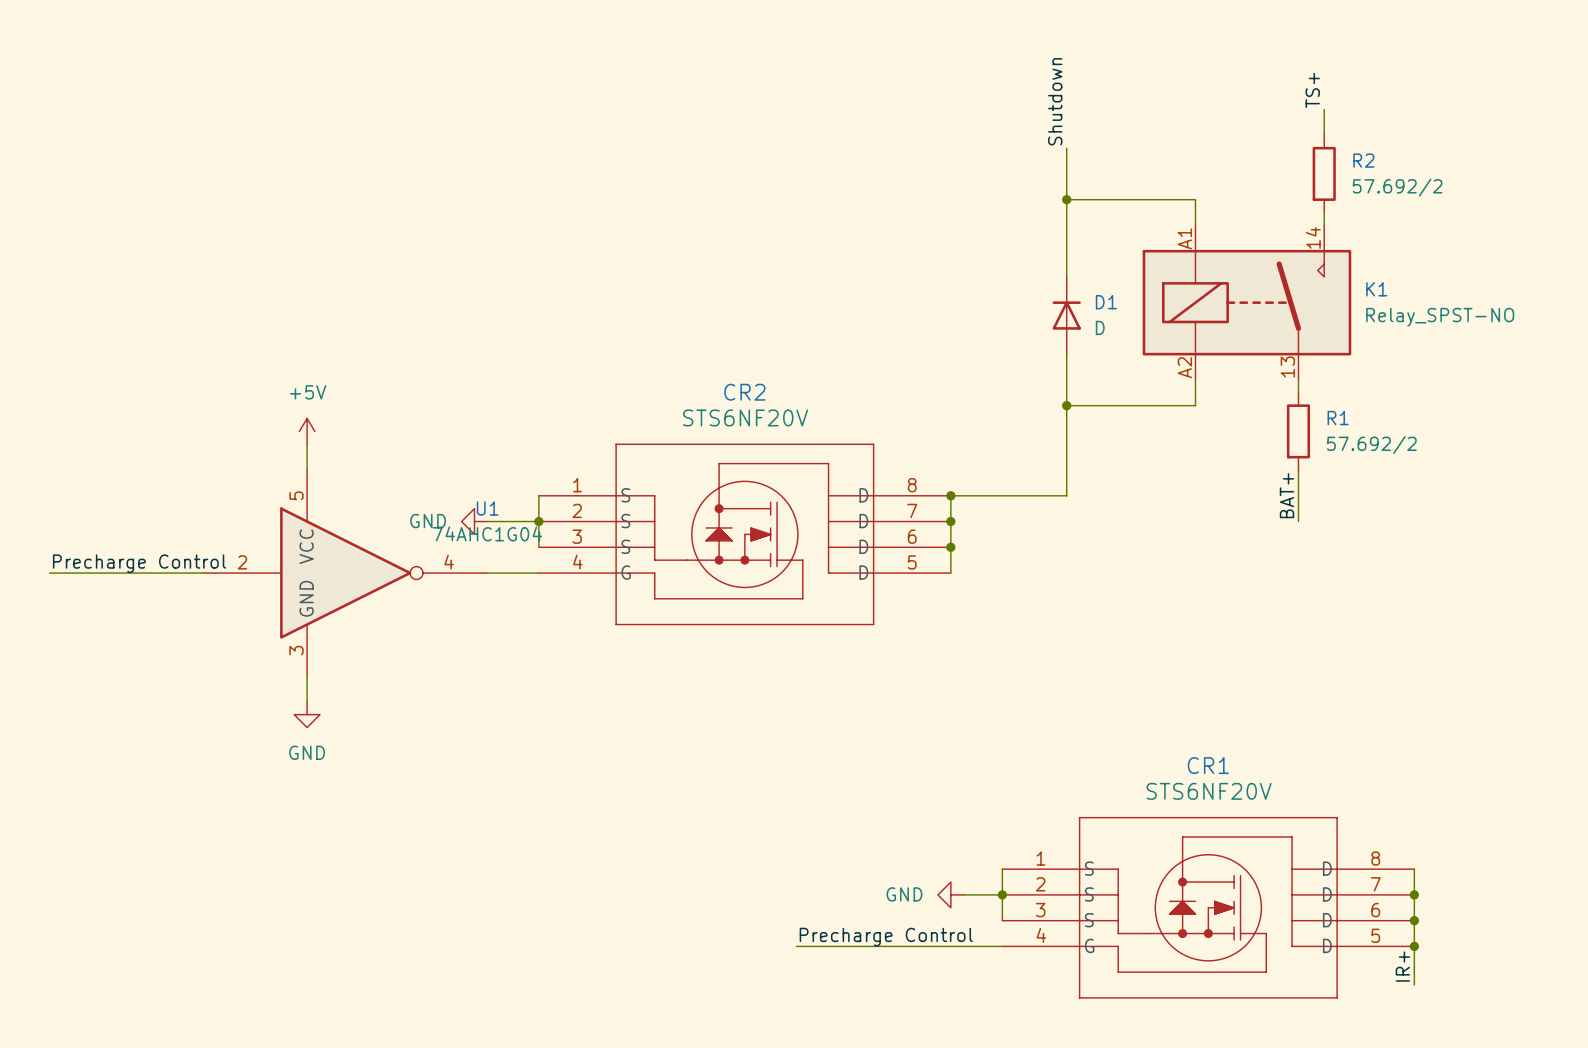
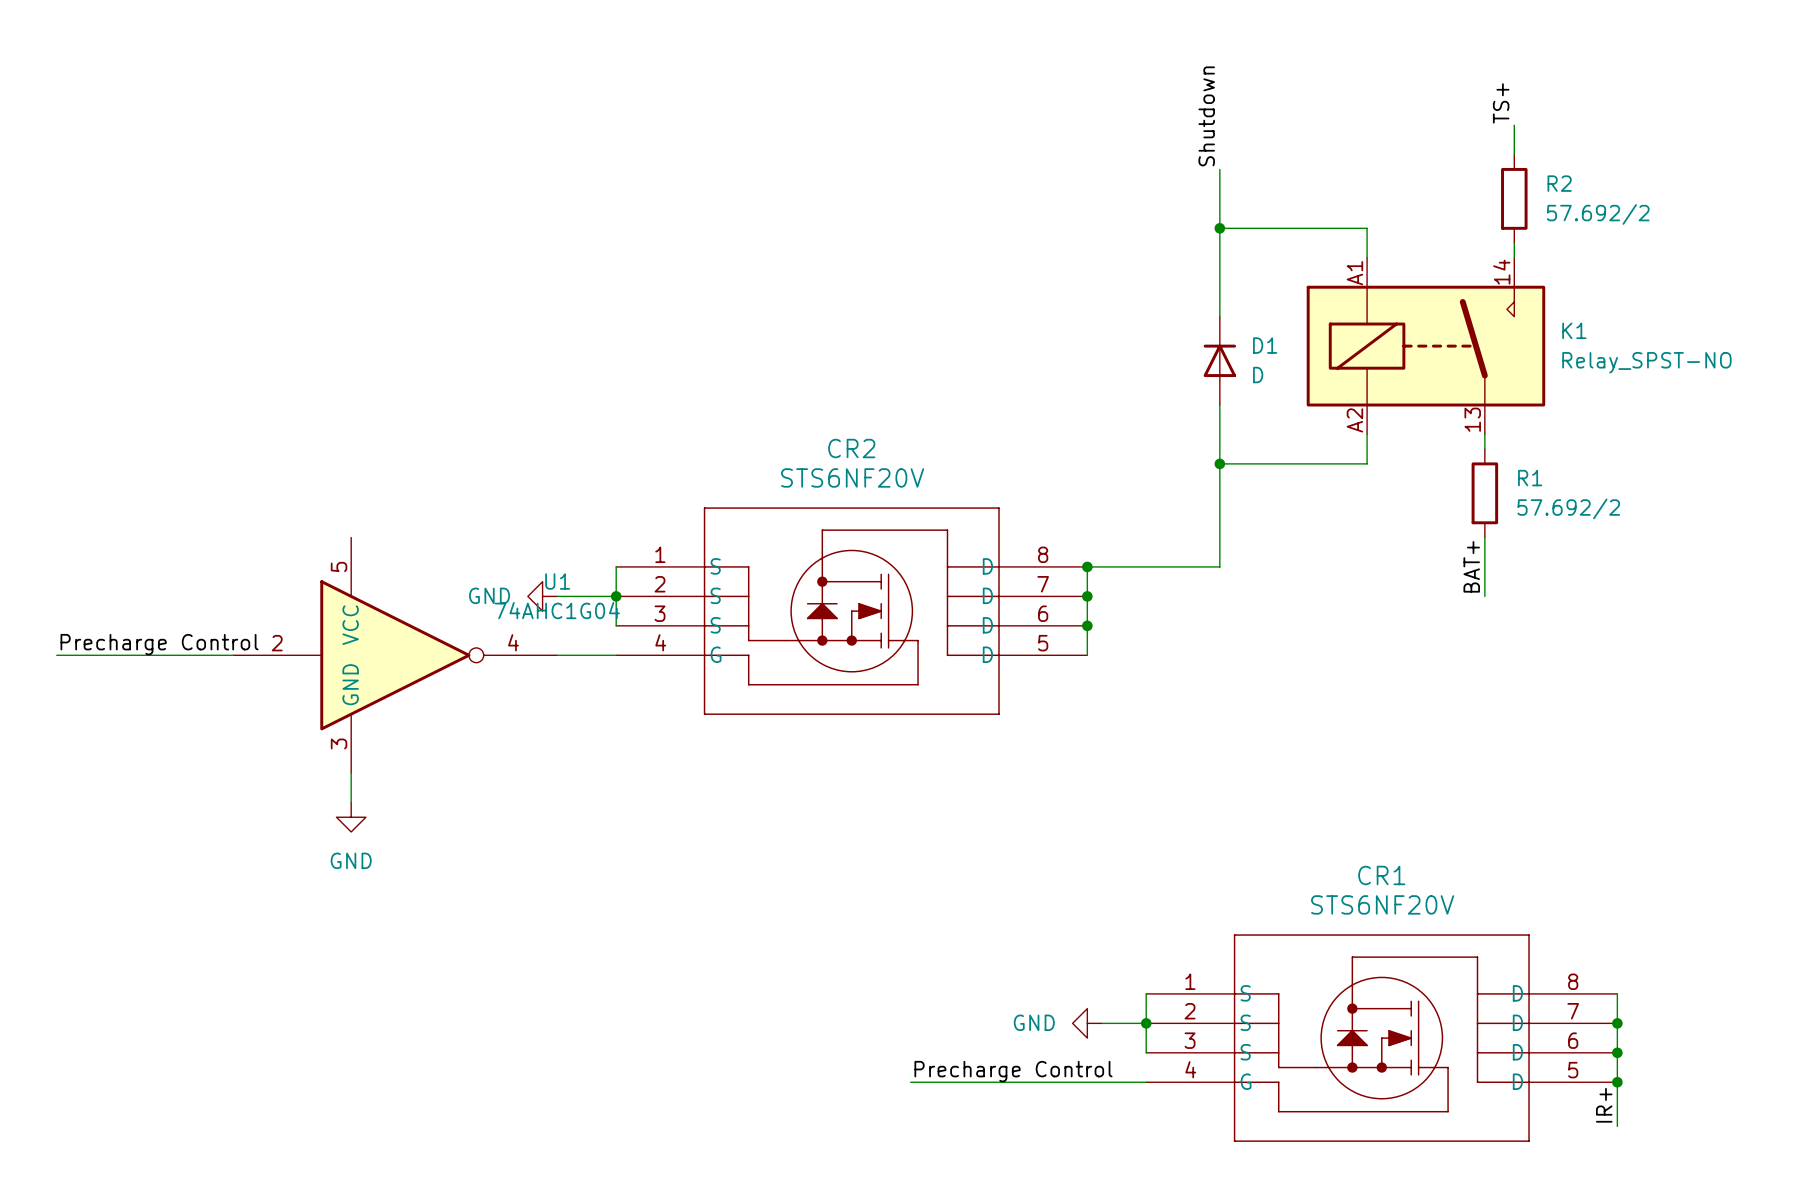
power symbol: +5V (307, 431) -> none
wire: (307, 444) (307, 470) -> none

